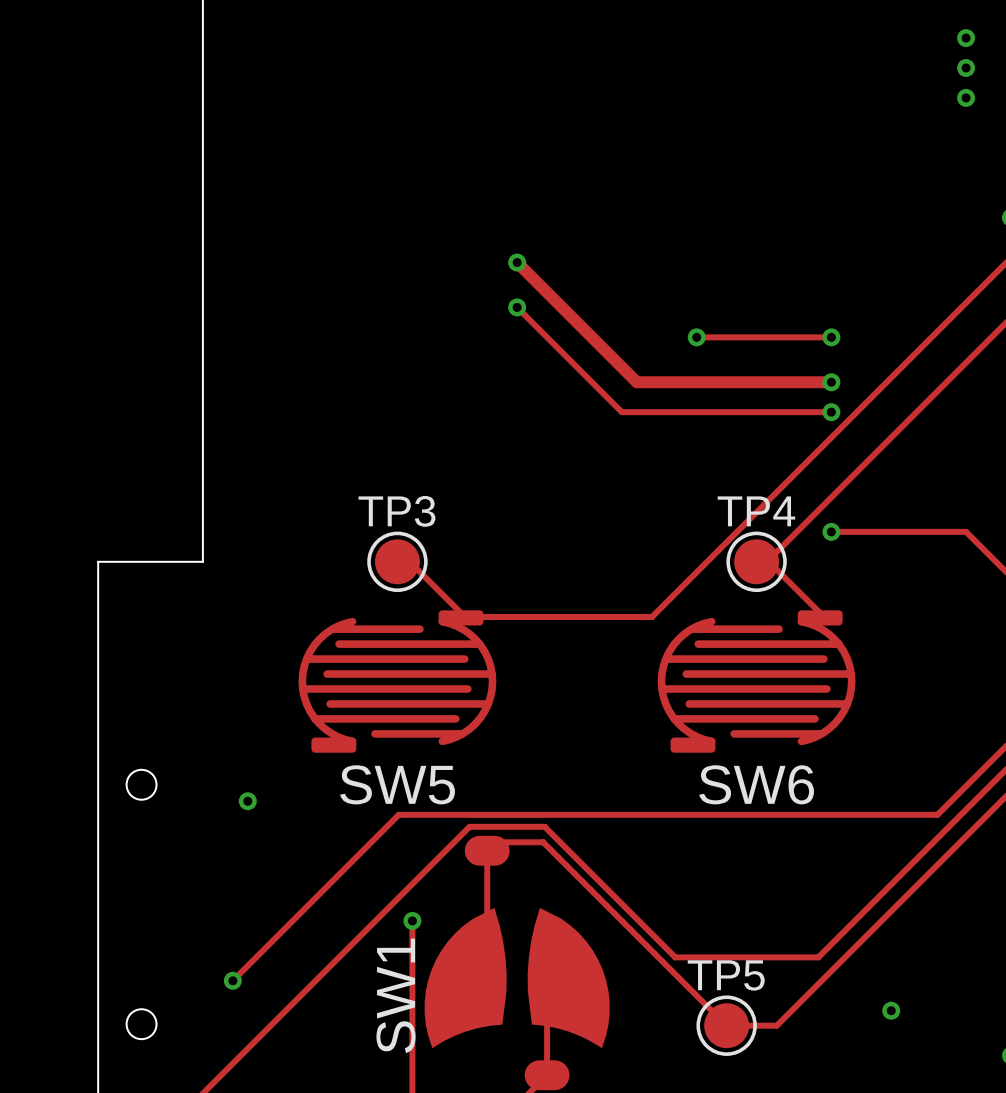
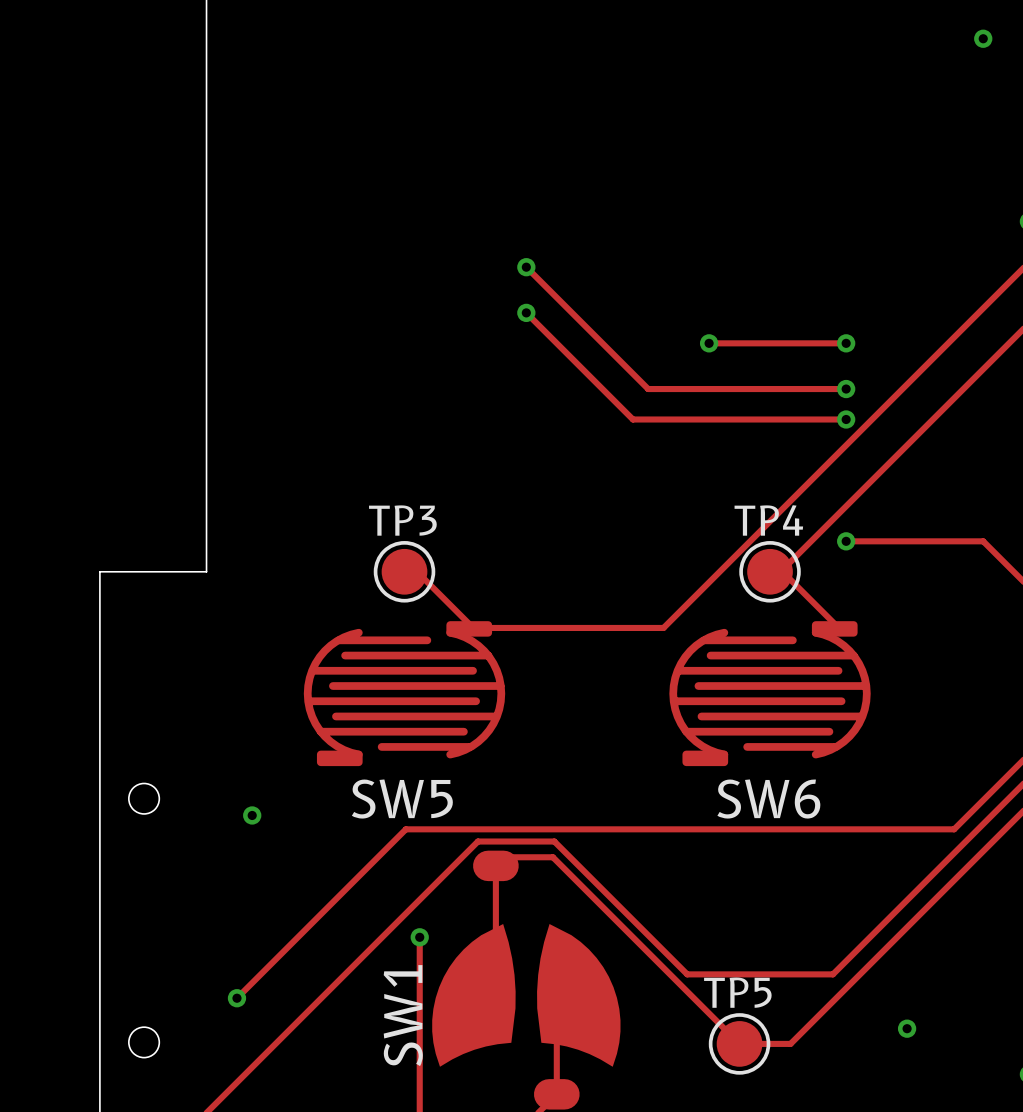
via: (966, 68) -> none
via: (966, 97) -> none
track width: thick (517, 262) (636, 382) (831, 382) -> thin (526, 267) (648, 389) (846, 389)

